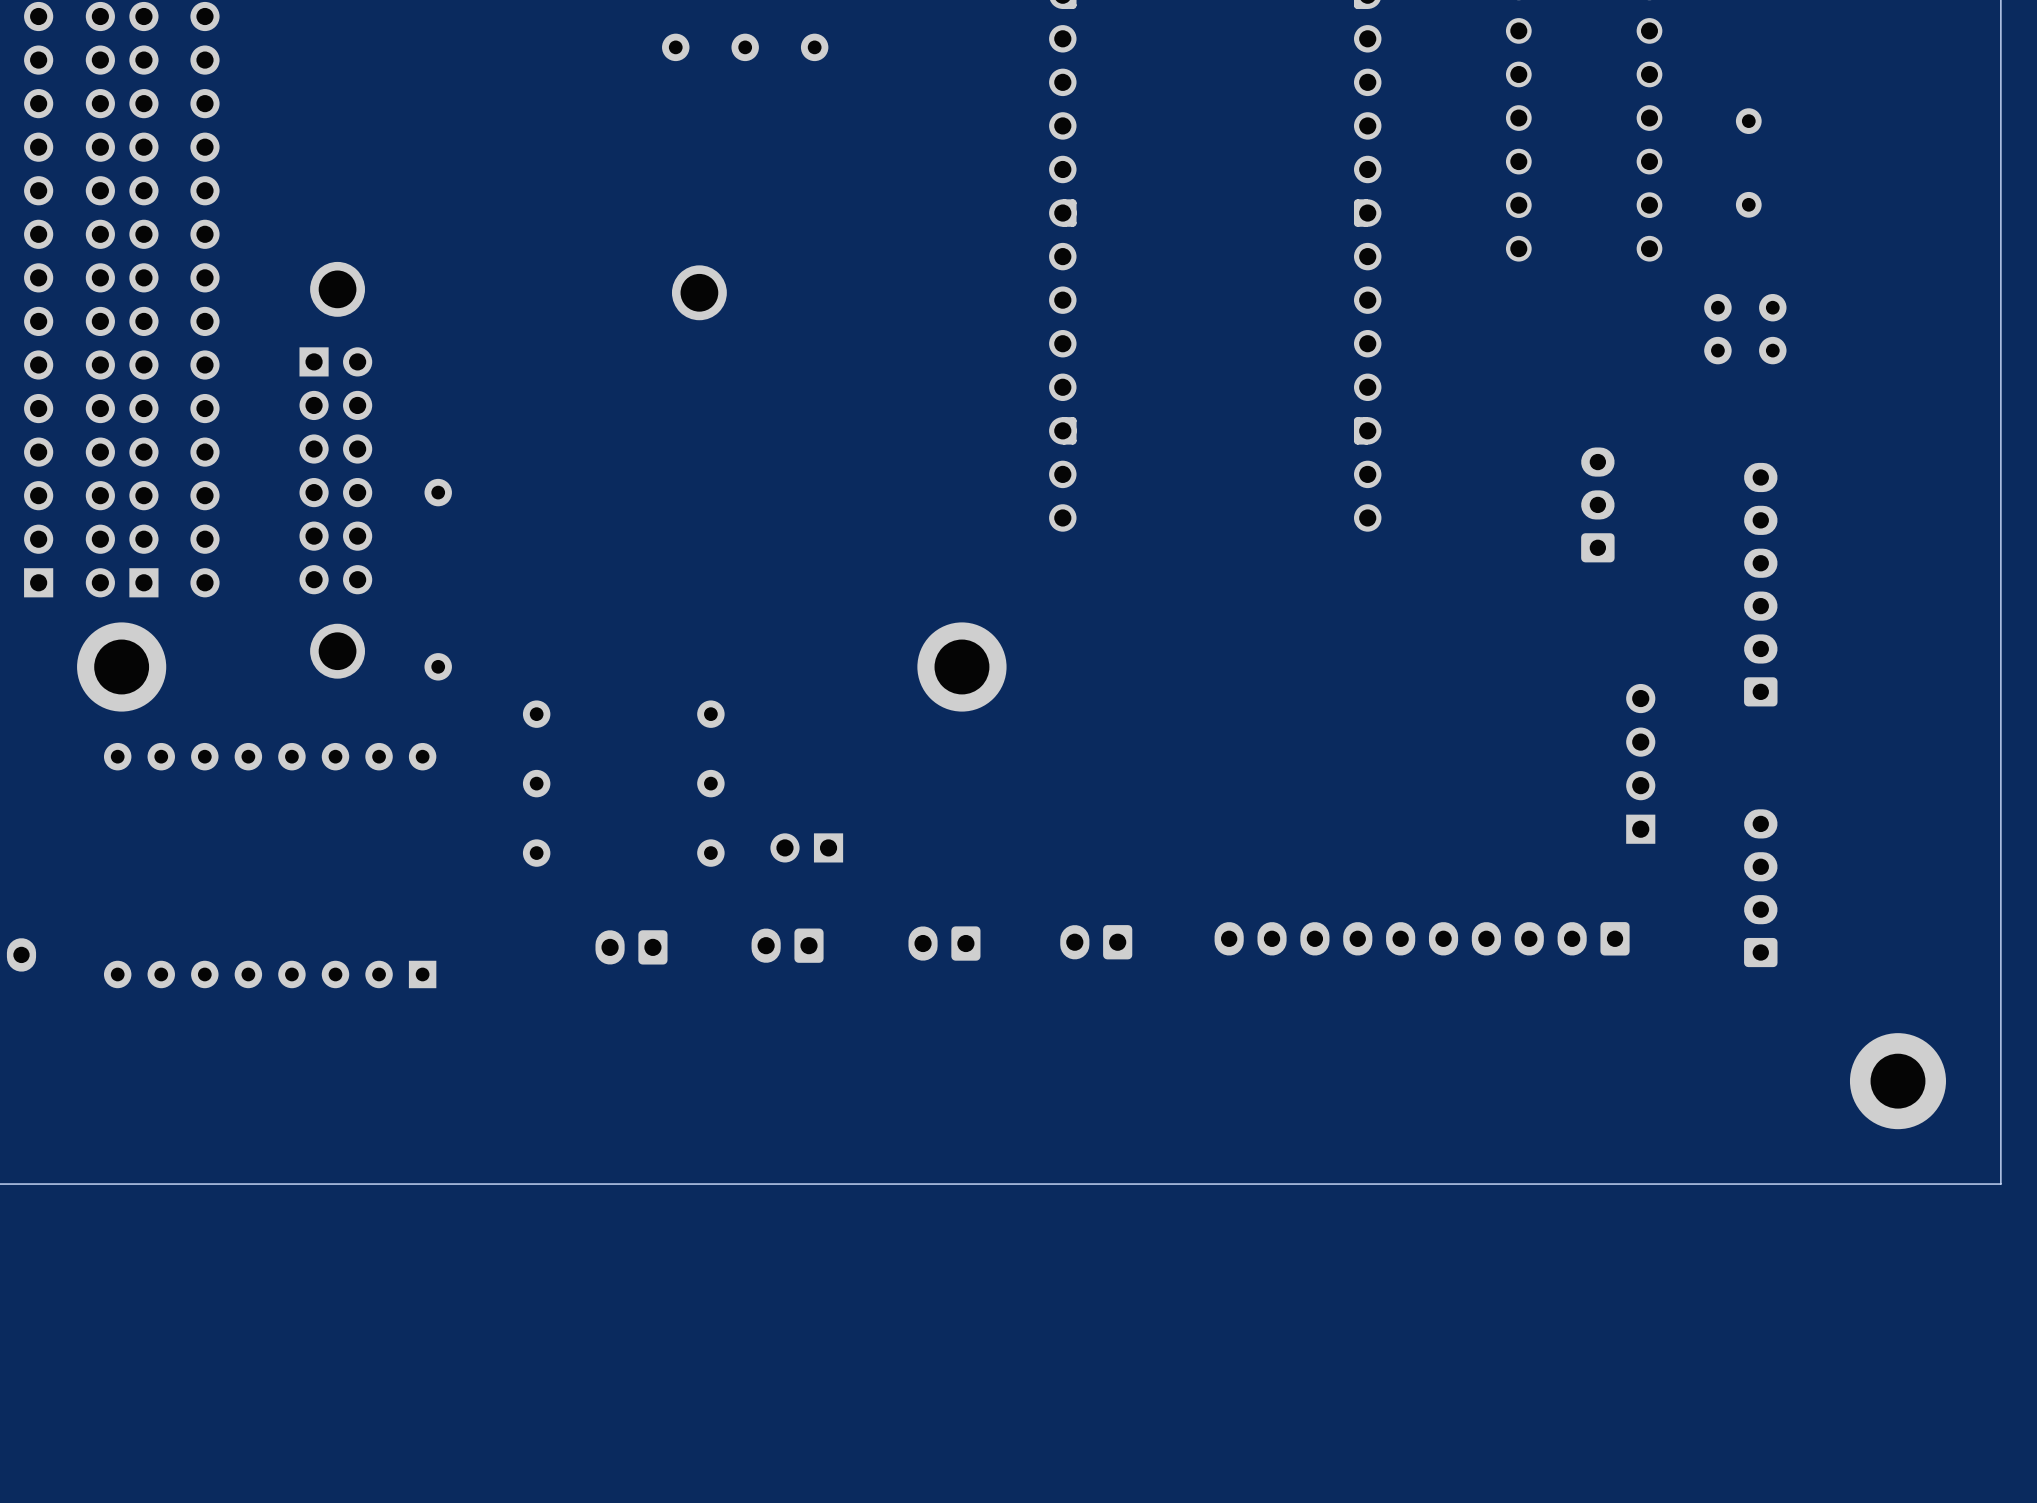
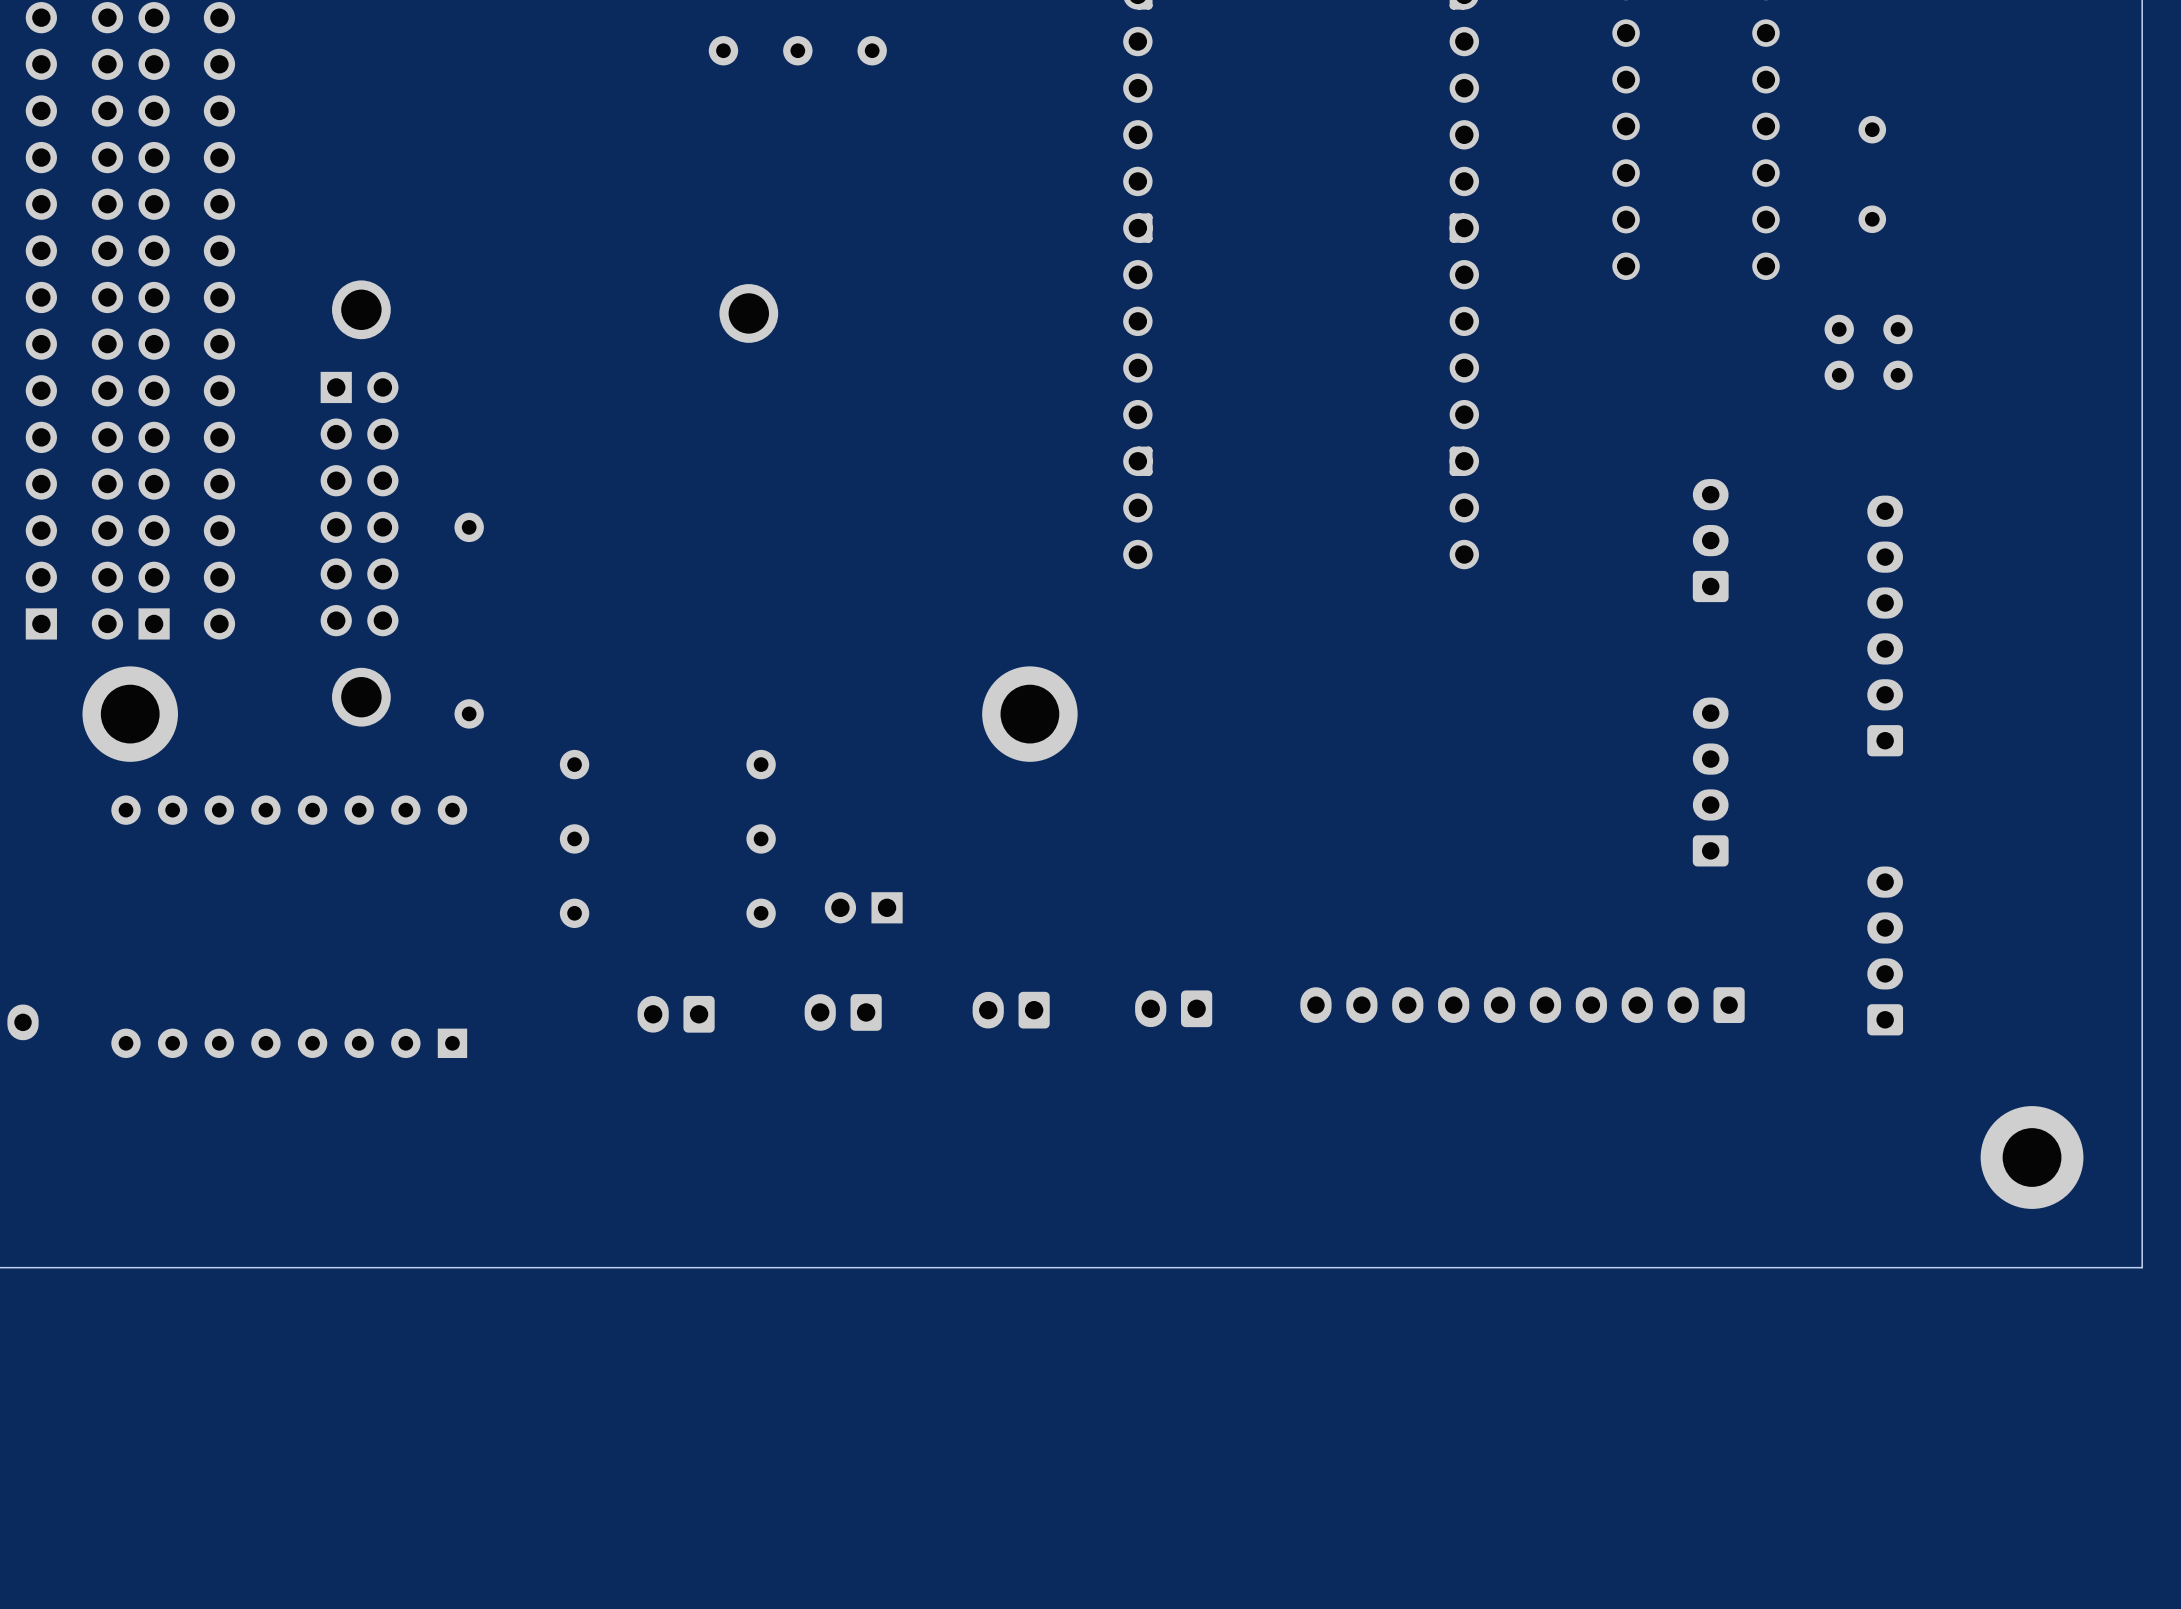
part: none -> (1710, 782)
part: (1640, 763) -> none

